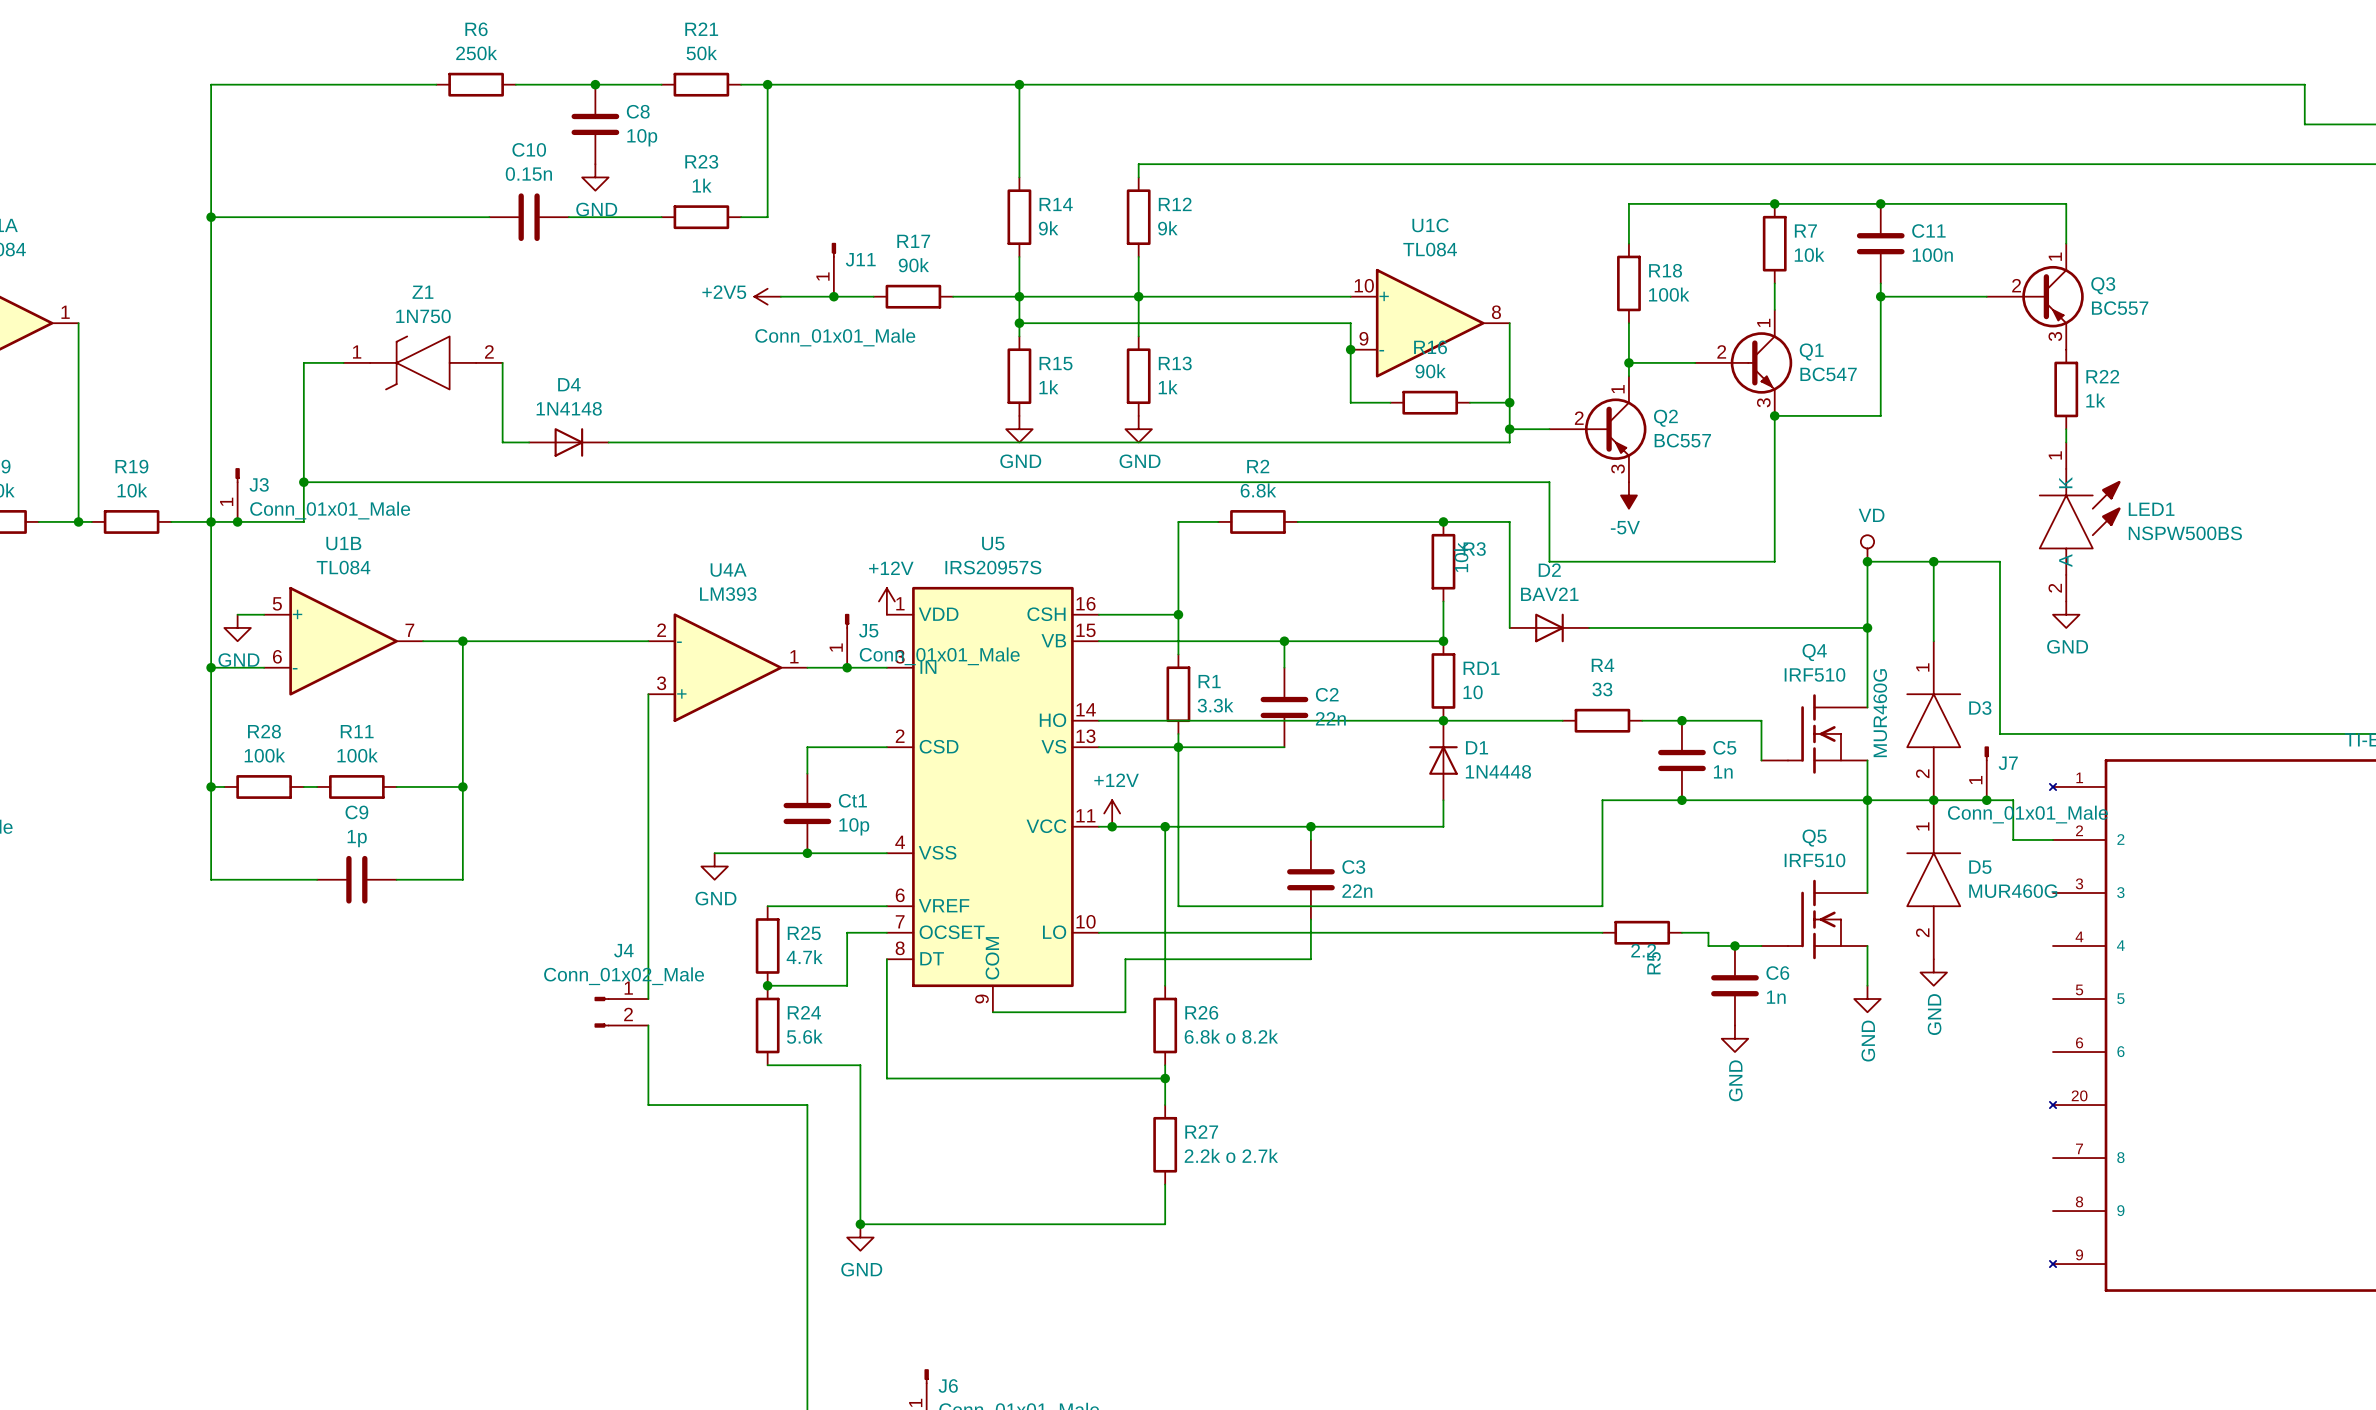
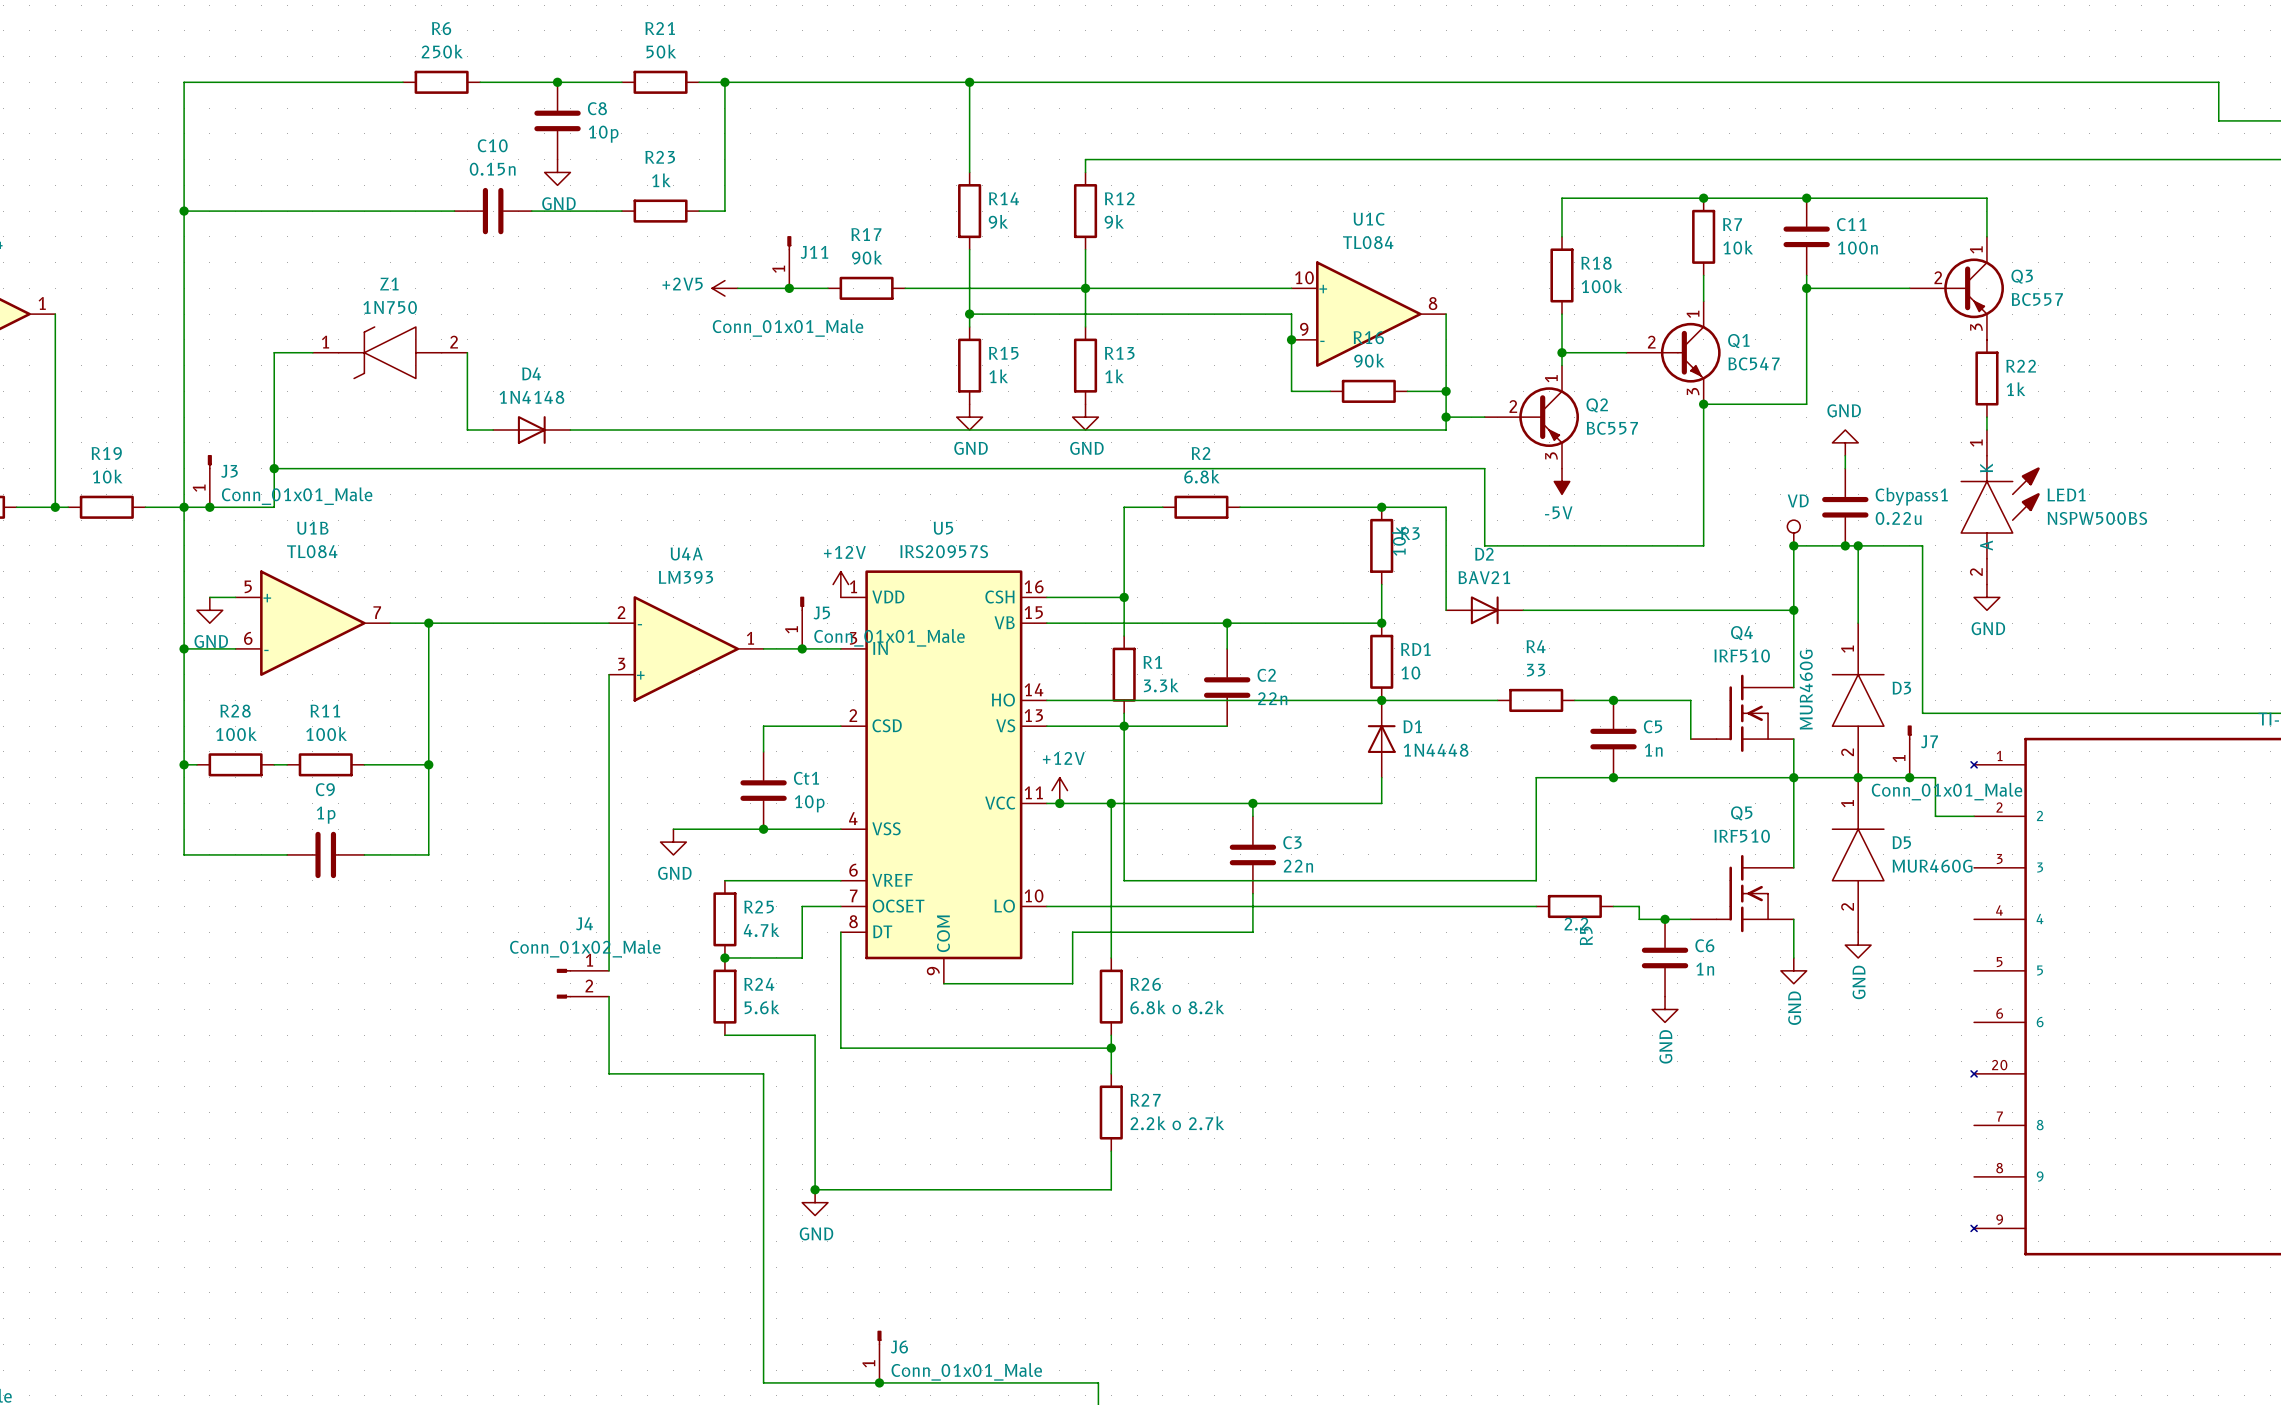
junction: (1019, 296) -> none
power symbol: none -> GND (1845, 442)
wire: none -> (1845, 455) (1845, 468)
Cbypass1: none -> 0.22u (1845, 507)
junction: none -> (1845, 545)

